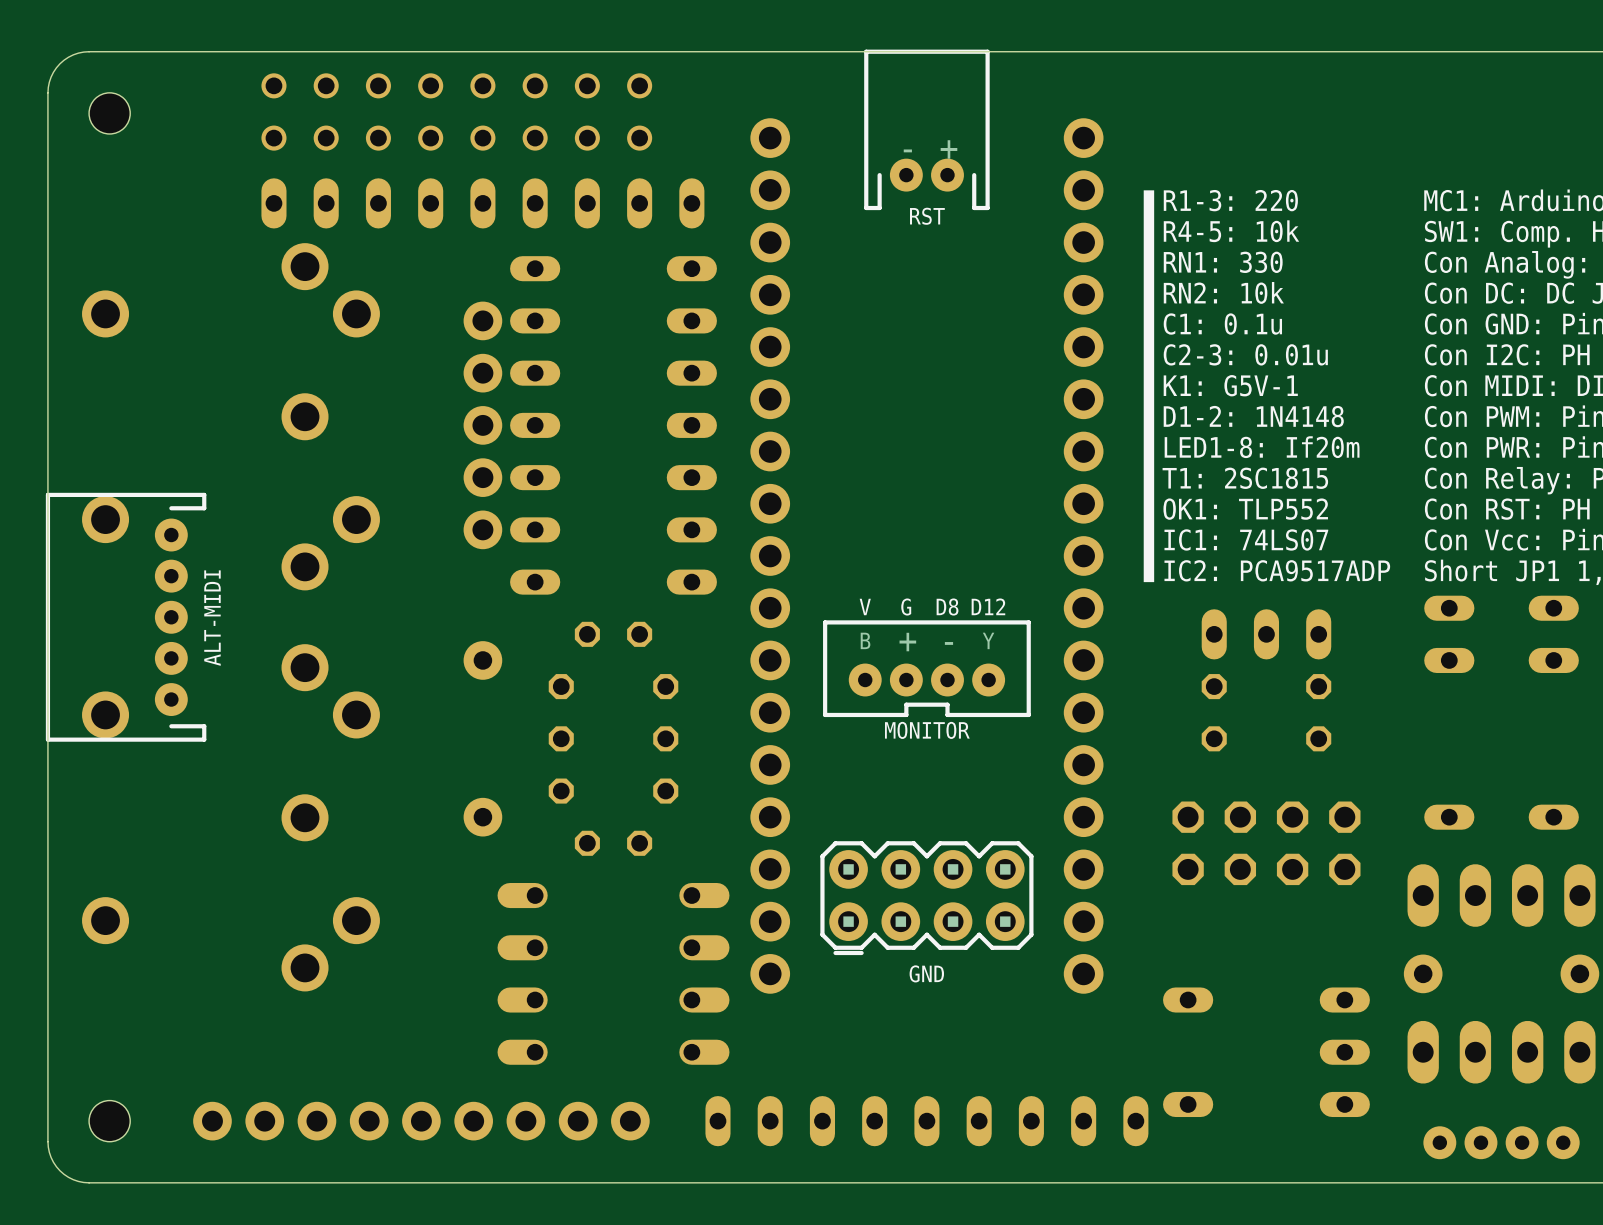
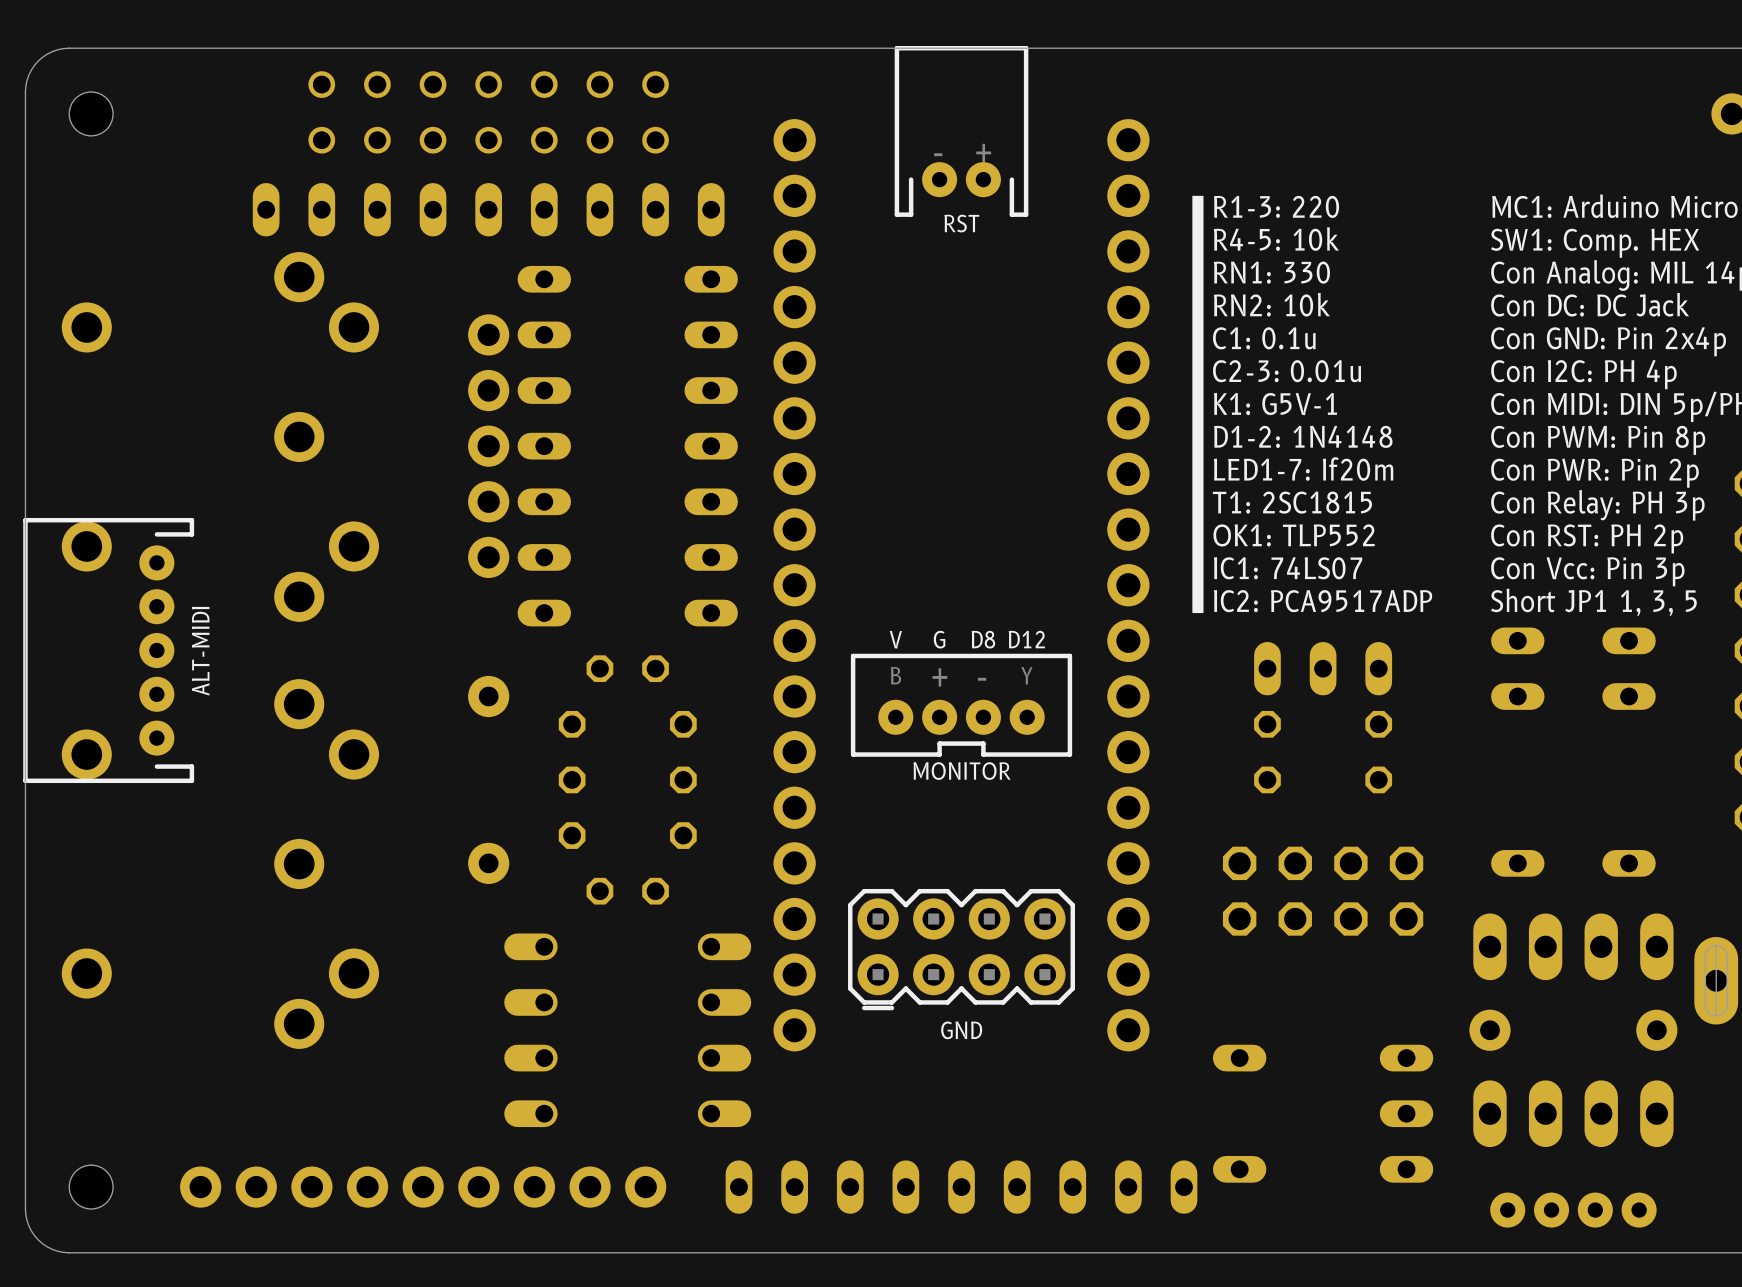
part: (273, 111) -> none
text: LED1-8: If20m (1262, 447) -> LED1-7: If20m (1303, 469)

